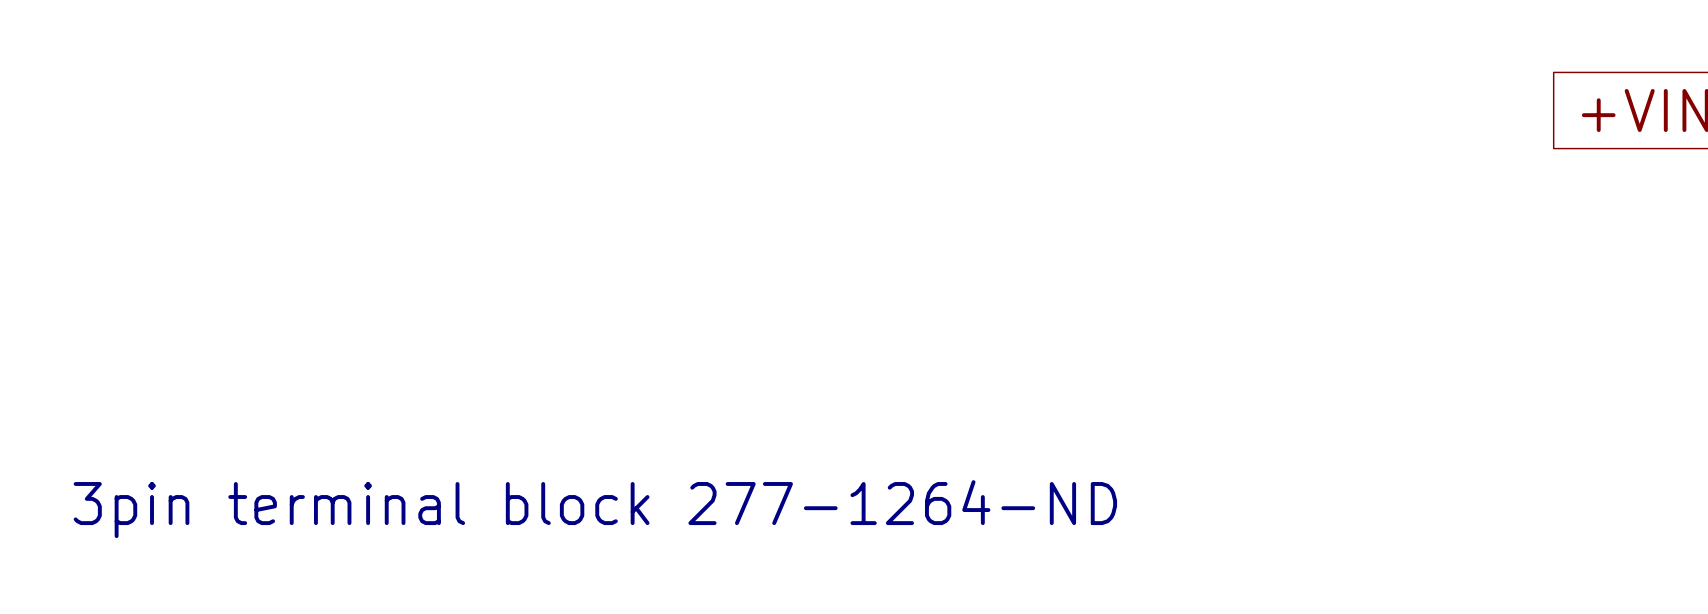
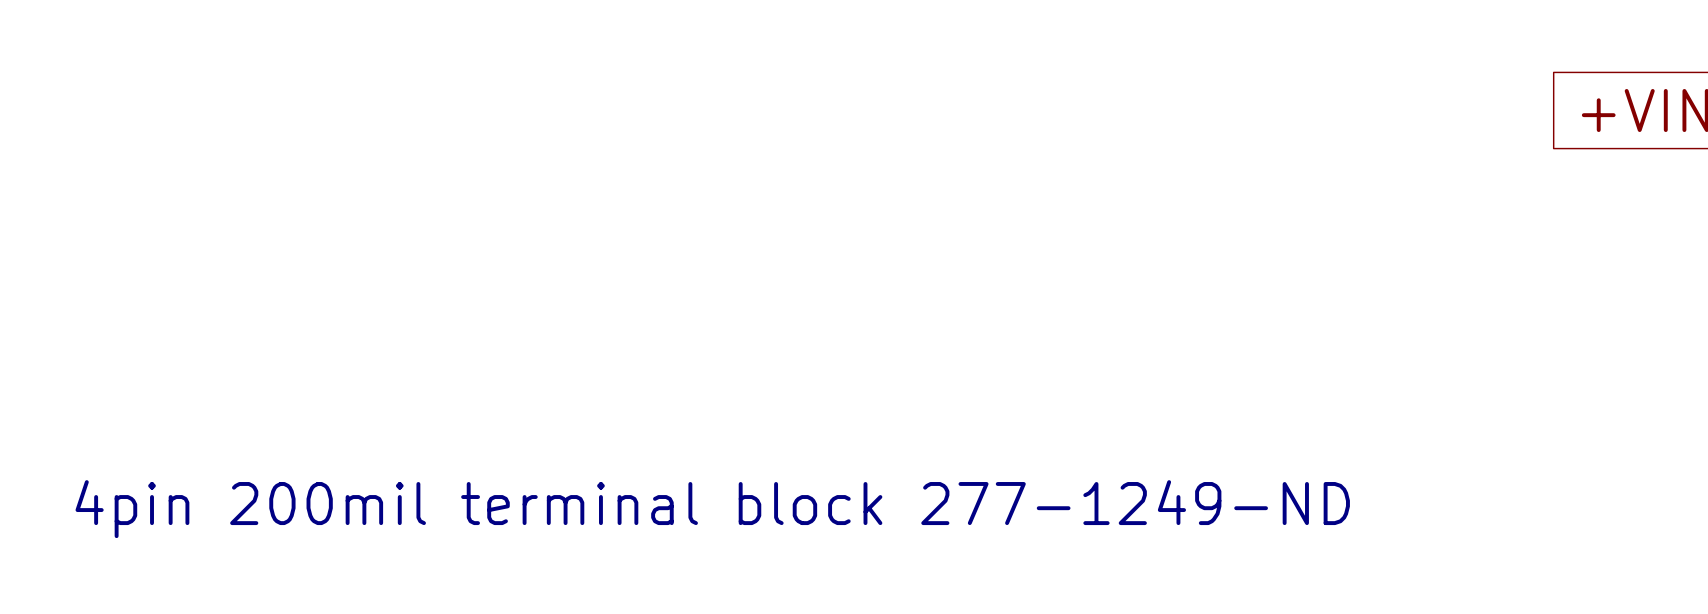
text: 3pin terminal block 277-1264-ND (595, 509) -> 4pin 200mil terminal block 277-1249-ND (712, 509)

